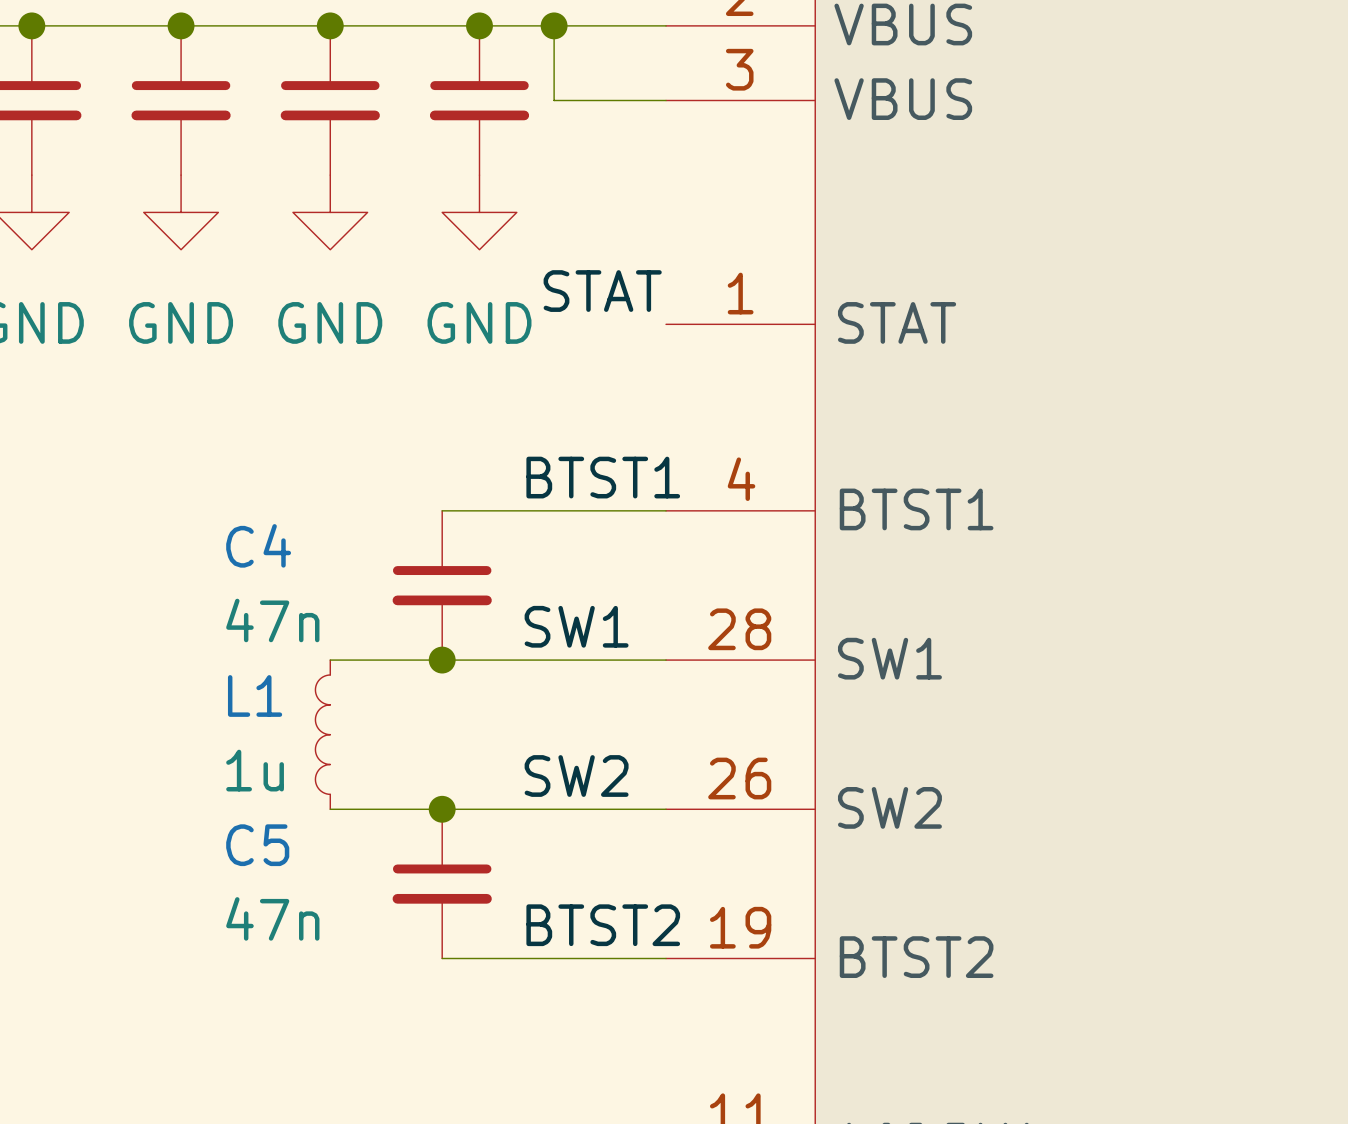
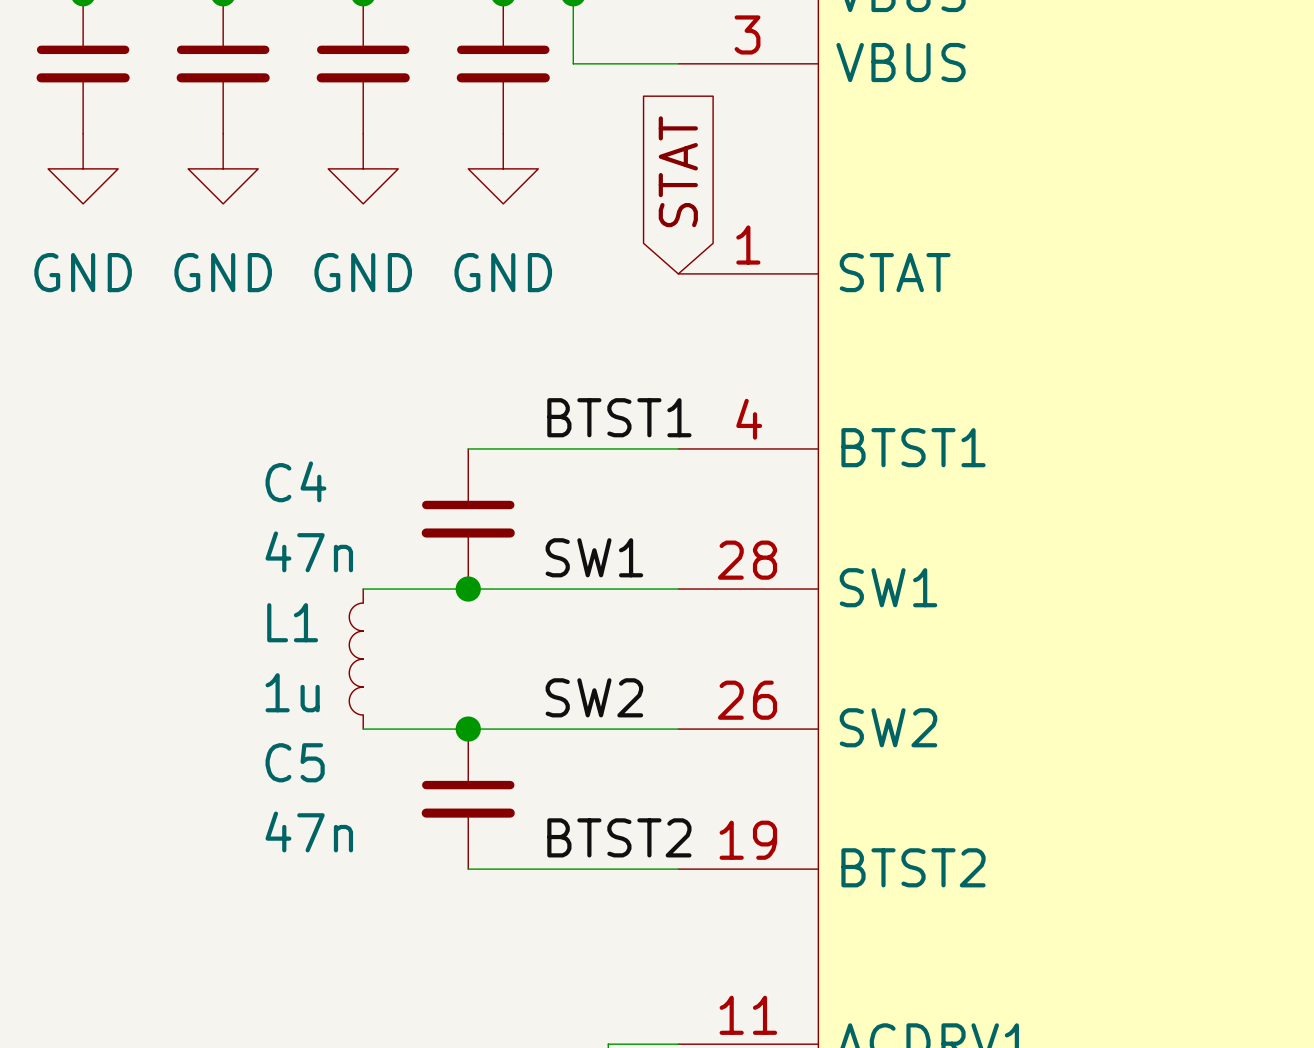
global label: none -> STAT (678, 171)
label: STAT (602, 291) -> none

